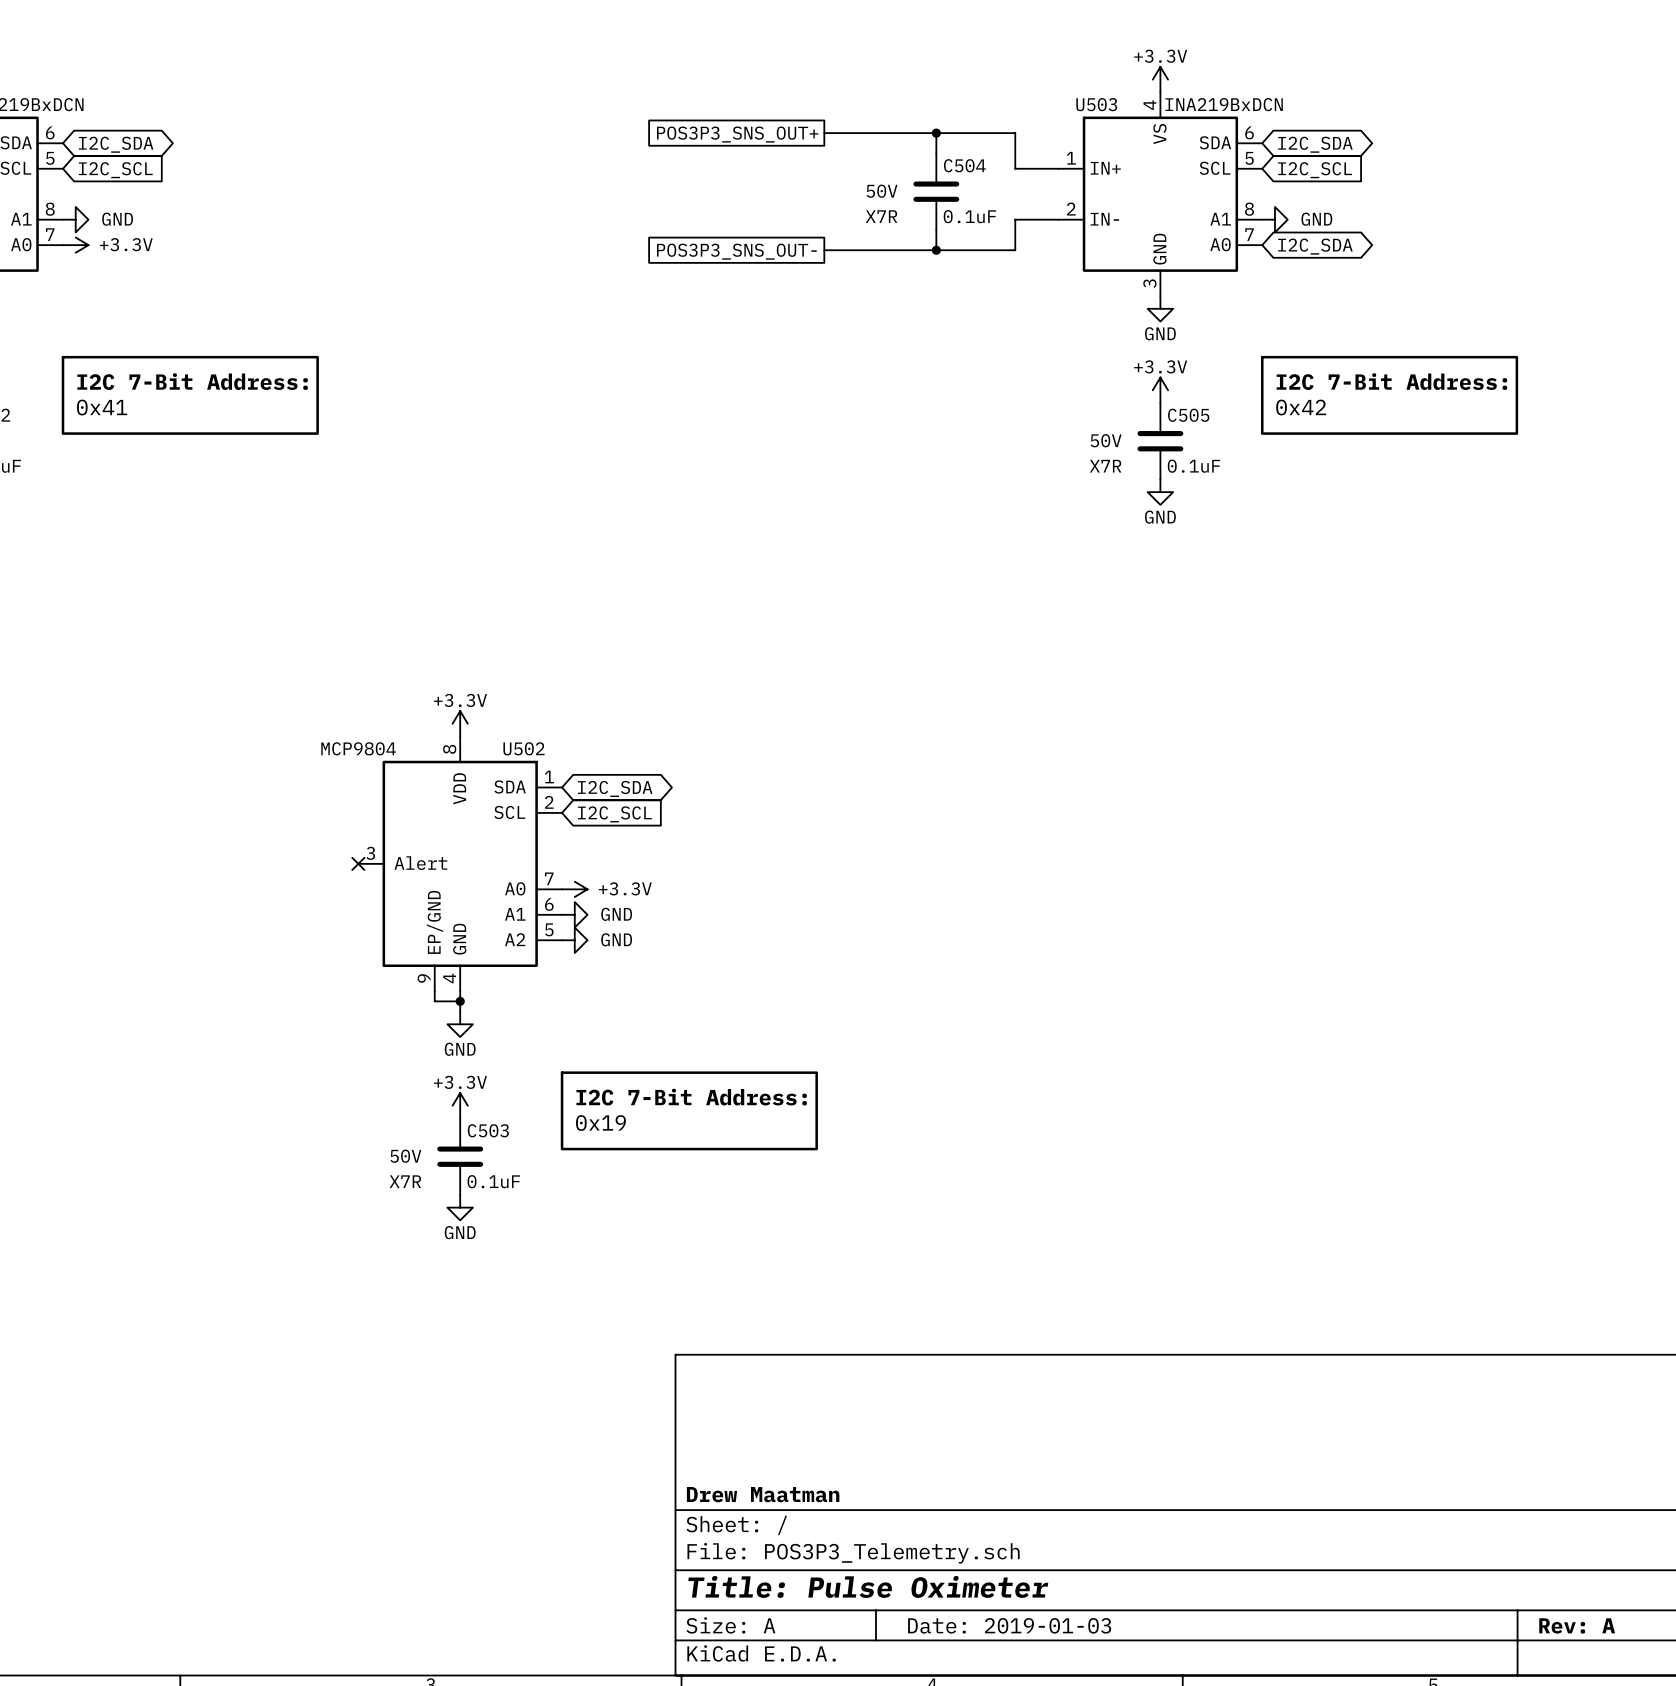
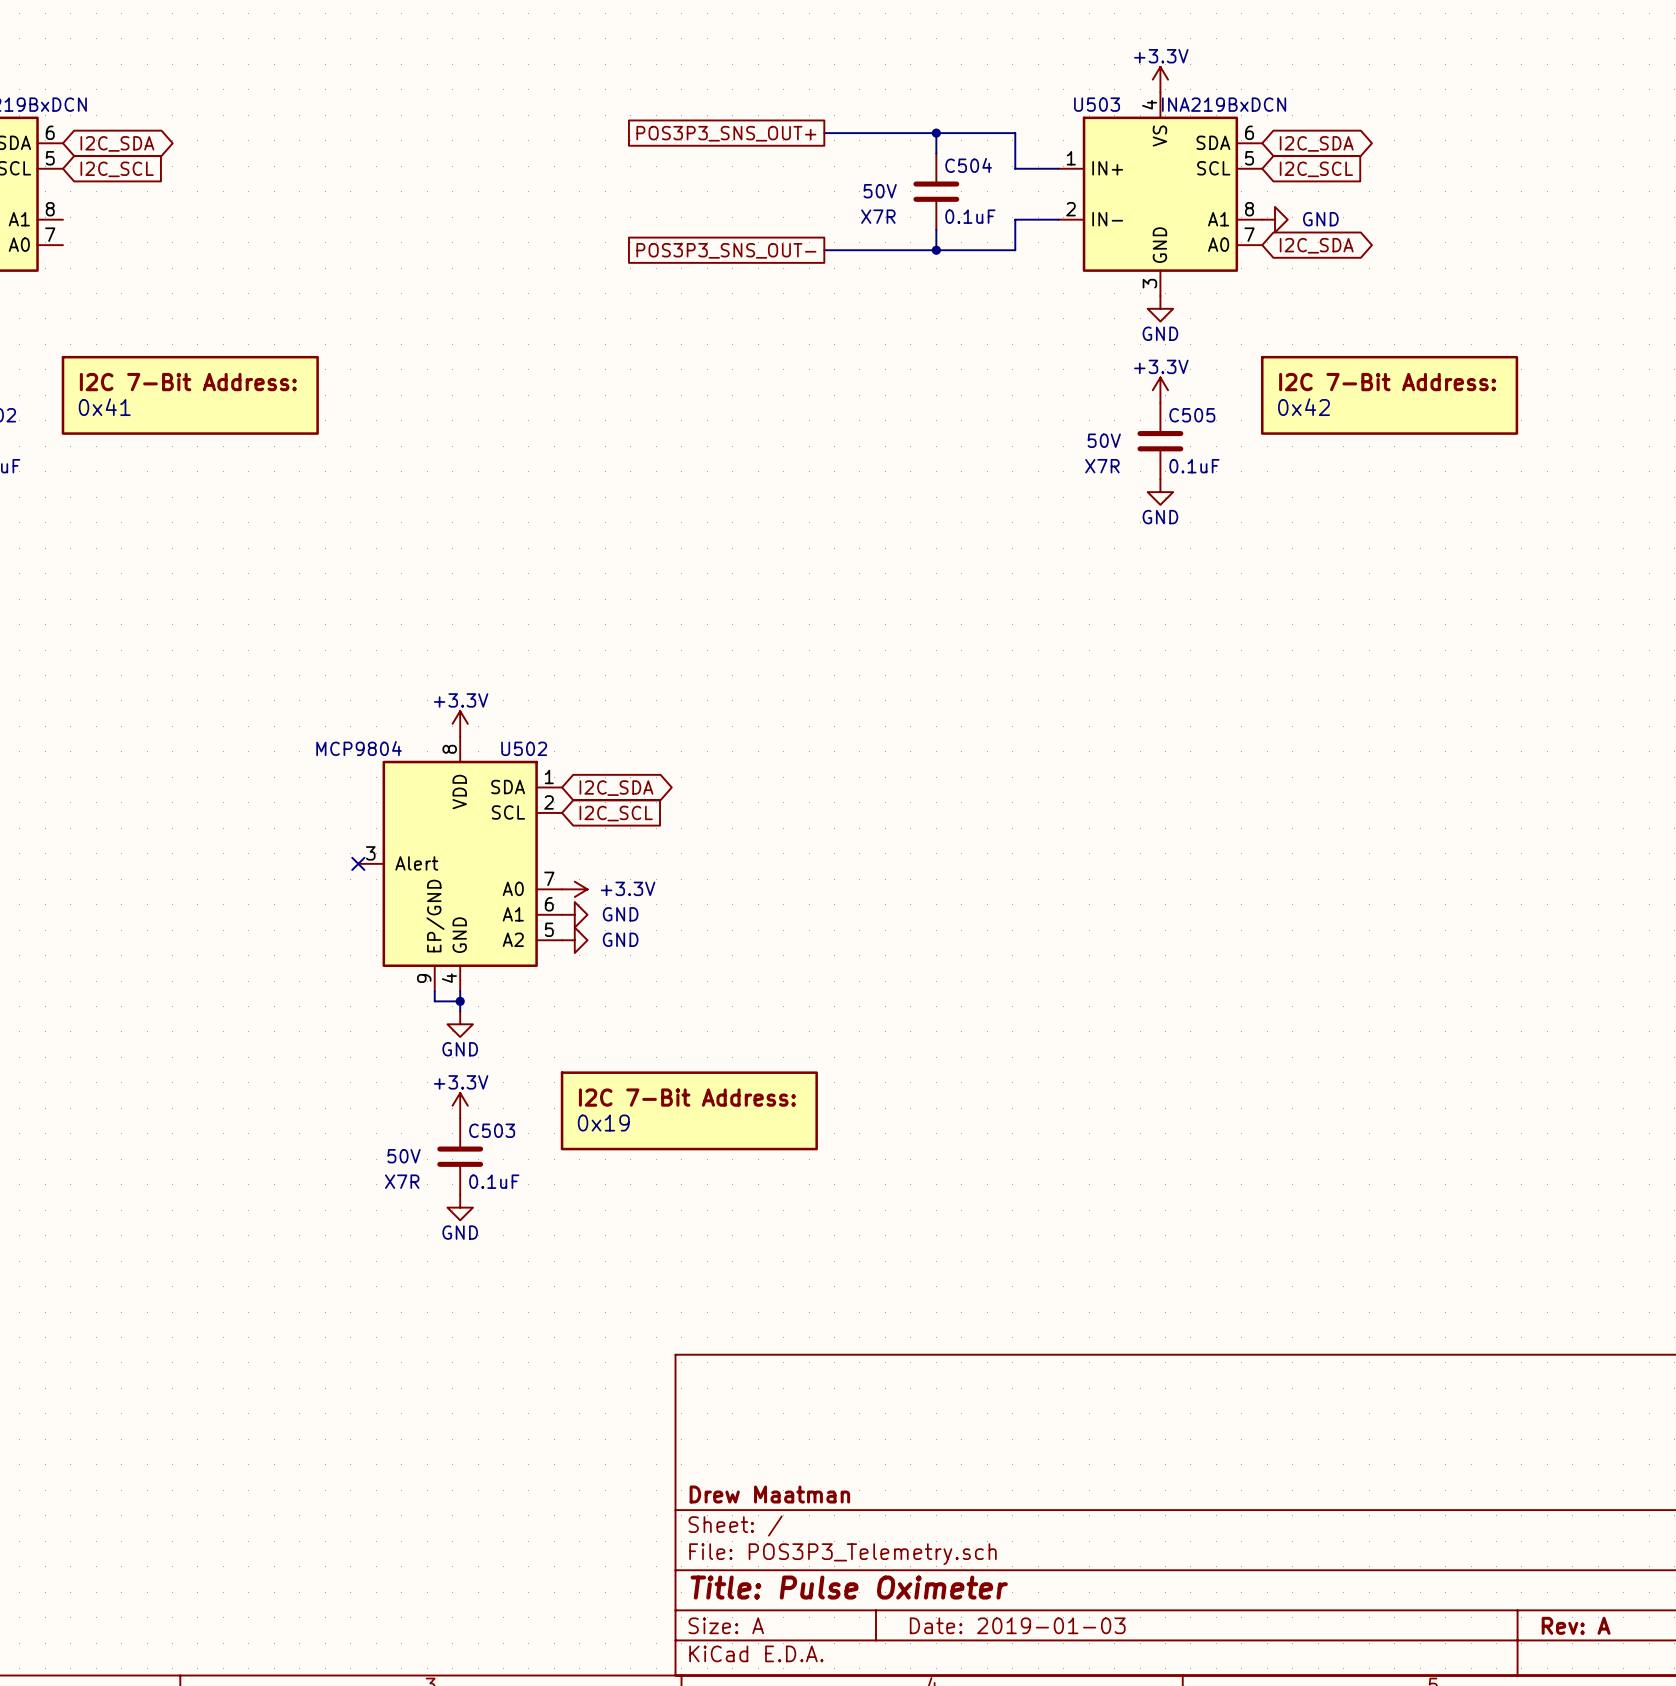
power symbol: GND (75, 219) -> none
power symbol: +3.3V (75, 245) -> none

